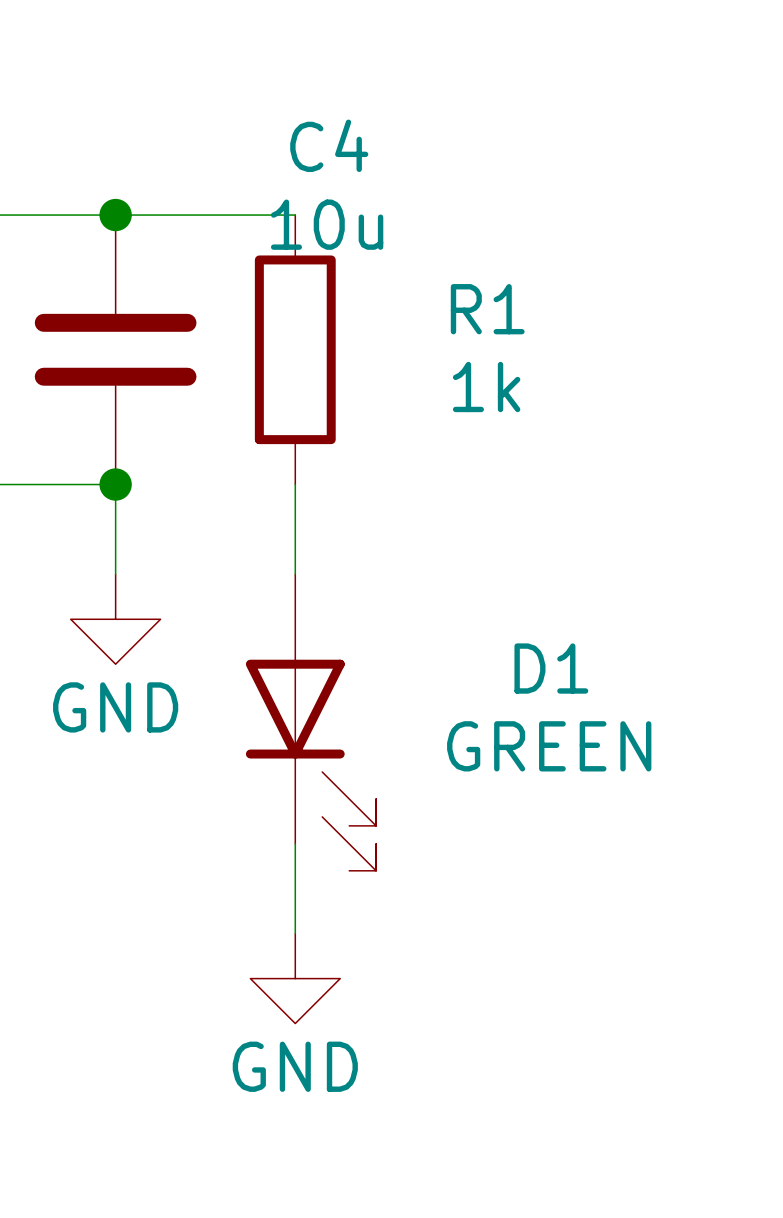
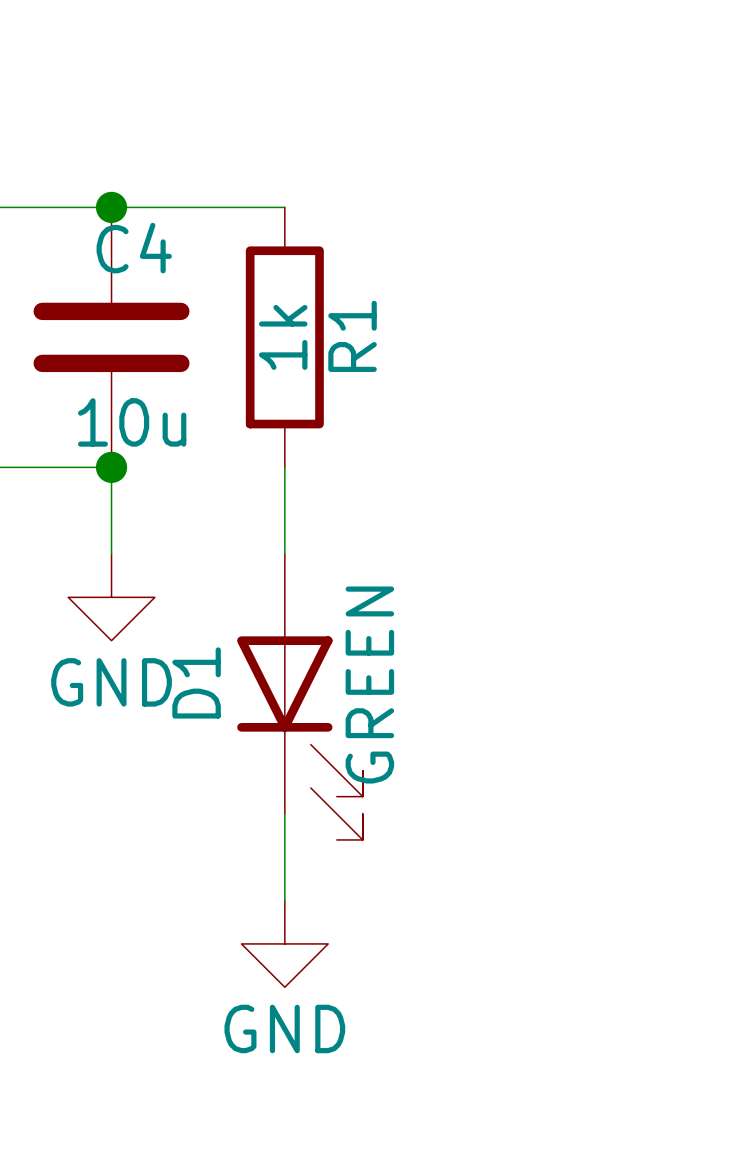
C4 name position: C4 (329, 145) -> C4 (134, 248)
C4 value position: 10u (327, 224) -> 10u (132, 422)
R1 name rotation: 0° (487, 309) -> 90° counterclockwise (352, 336)
R1 name position: R1 (487, 309) -> R1 (352, 336)
R1 value rotation: 0° (486, 387) -> 90° counterclockwise (283, 337)
R1 value position: 1k (486, 387) -> 1k (283, 337)
D1 name rotation: 0° (551, 668) -> 90° counterclockwise (196, 682)
D1 name position: D1 (551, 668) -> D1 (196, 682)
D1 value rotation: 0° (549, 746) -> 90° counterclockwise (369, 685)

